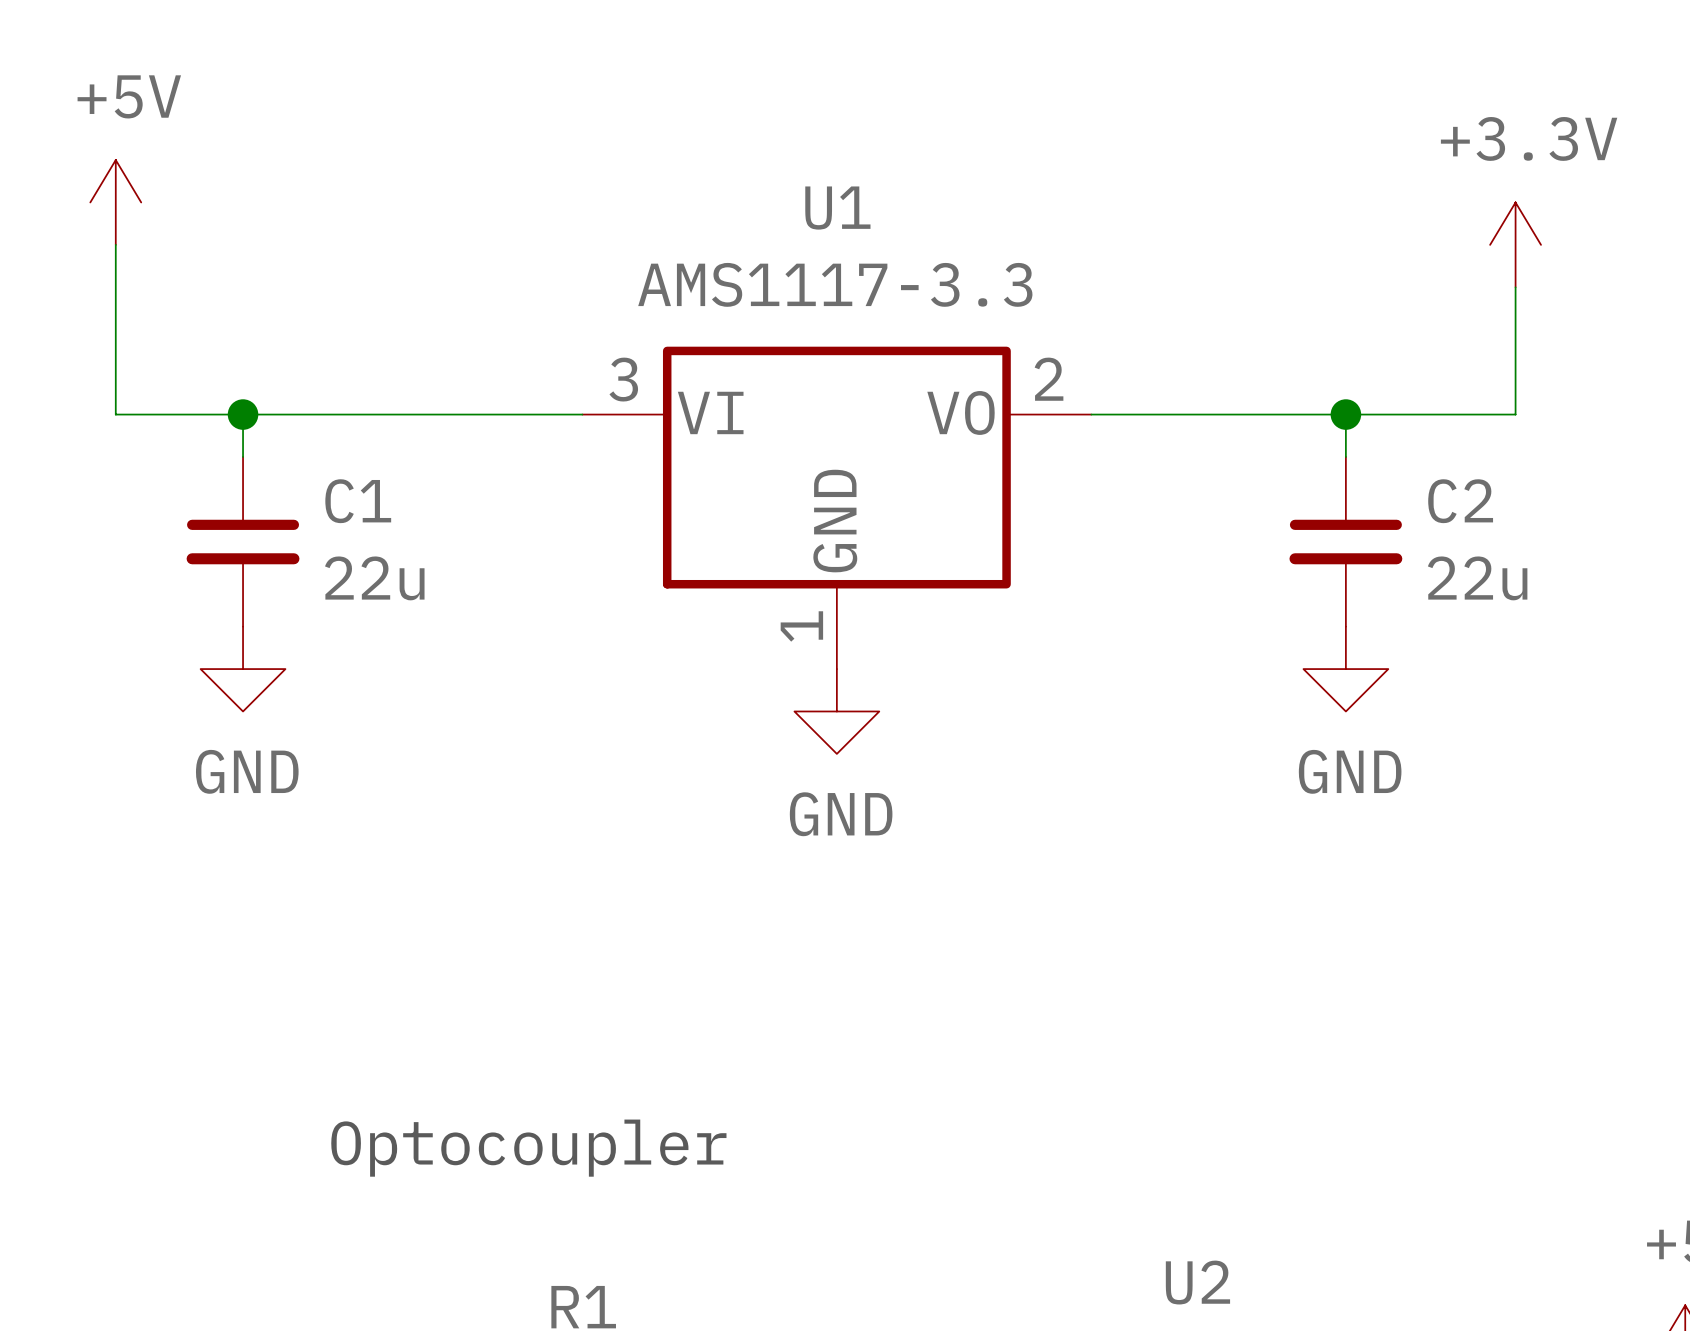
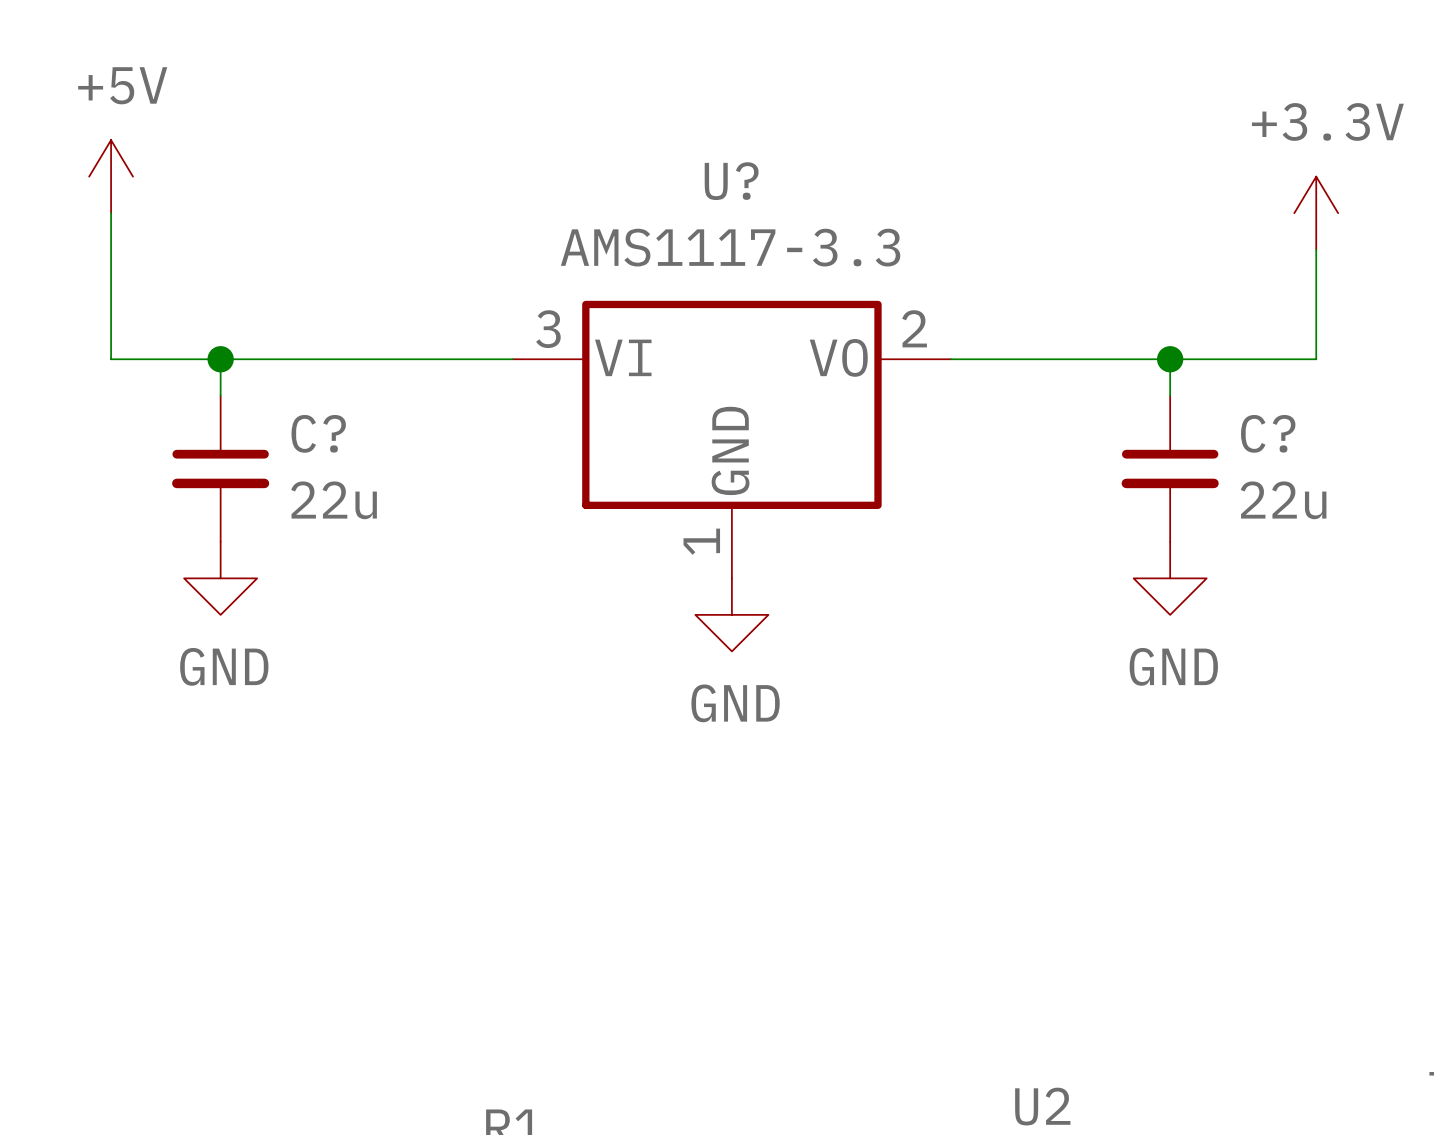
U1 name: U1 (837, 208) -> U? (731, 181)
C1 name: C1 (358, 501) -> C? (318, 433)
C2 name: C2 (1460, 501) -> C? (1268, 433)
text: Optocoupler (528, 1148) -> none

